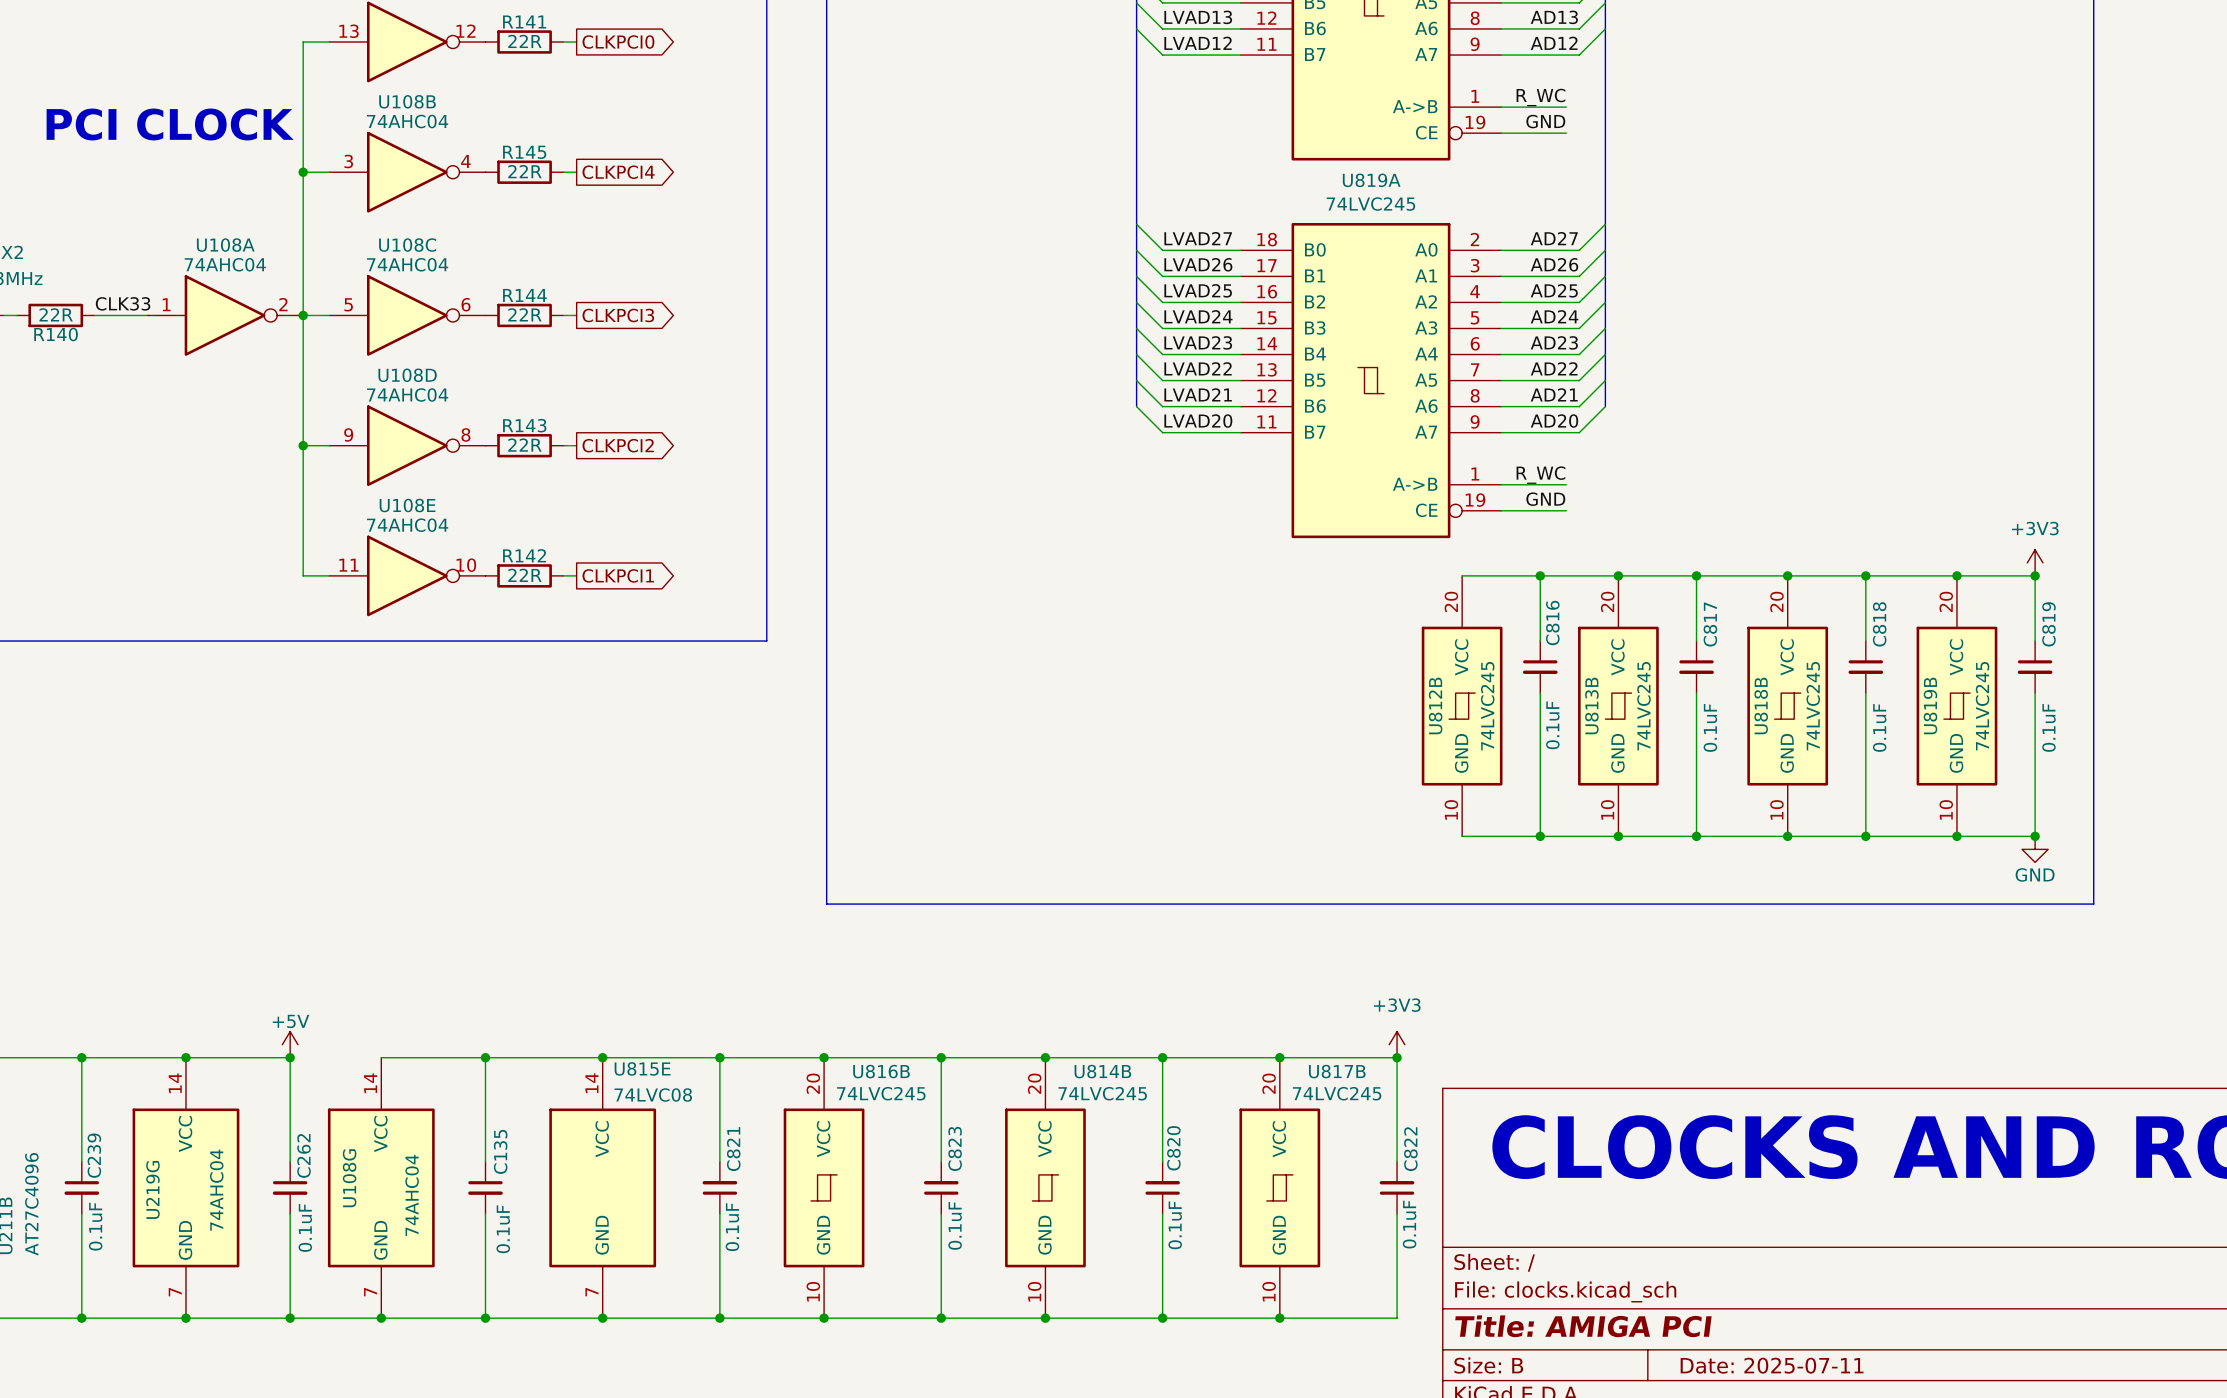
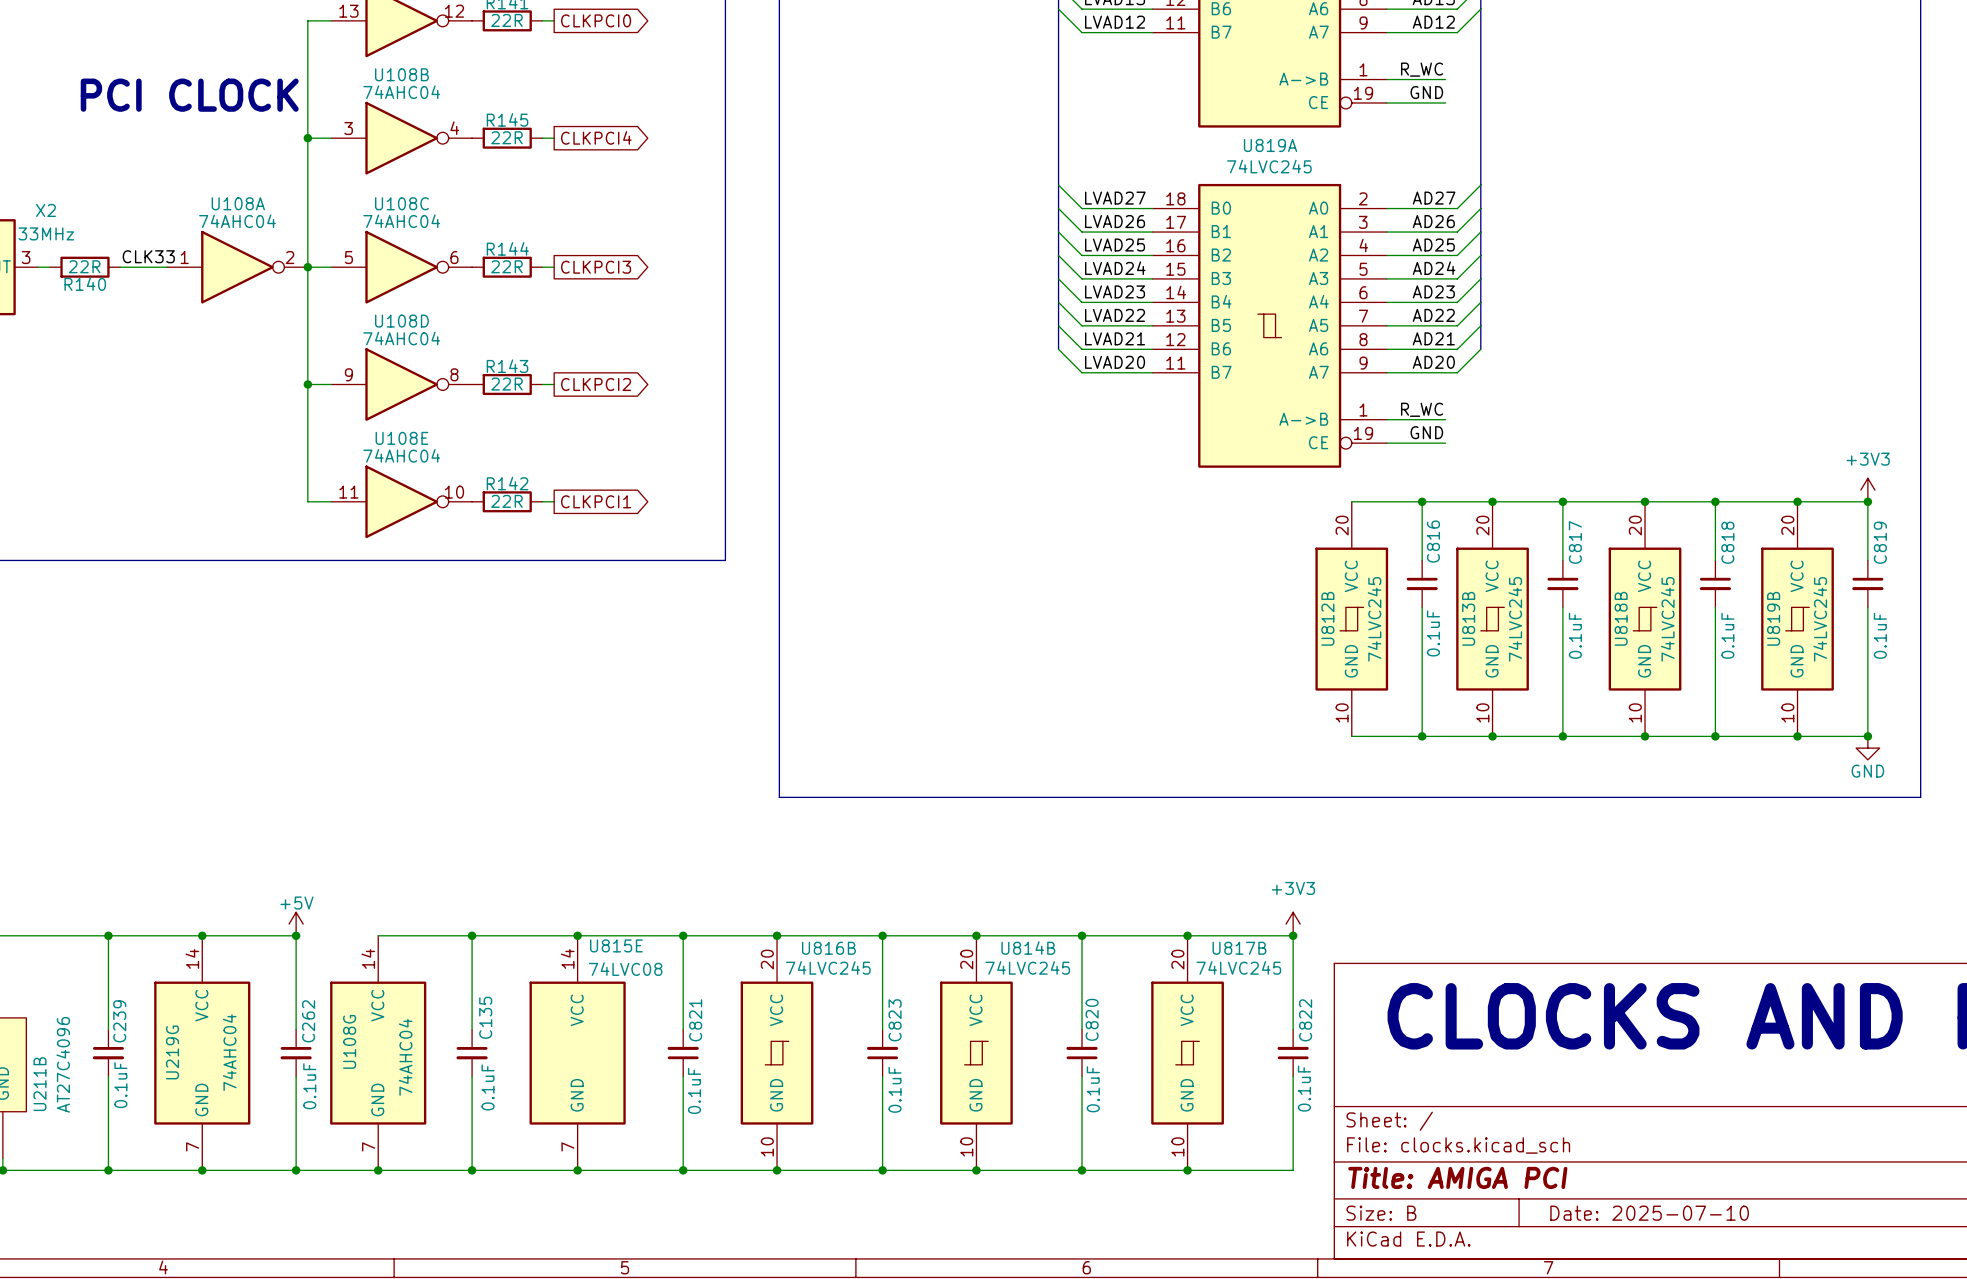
title block: Date: 2025-07-11 (1772, 1365) -> Date: 2025-07-10 (1649, 1213)

